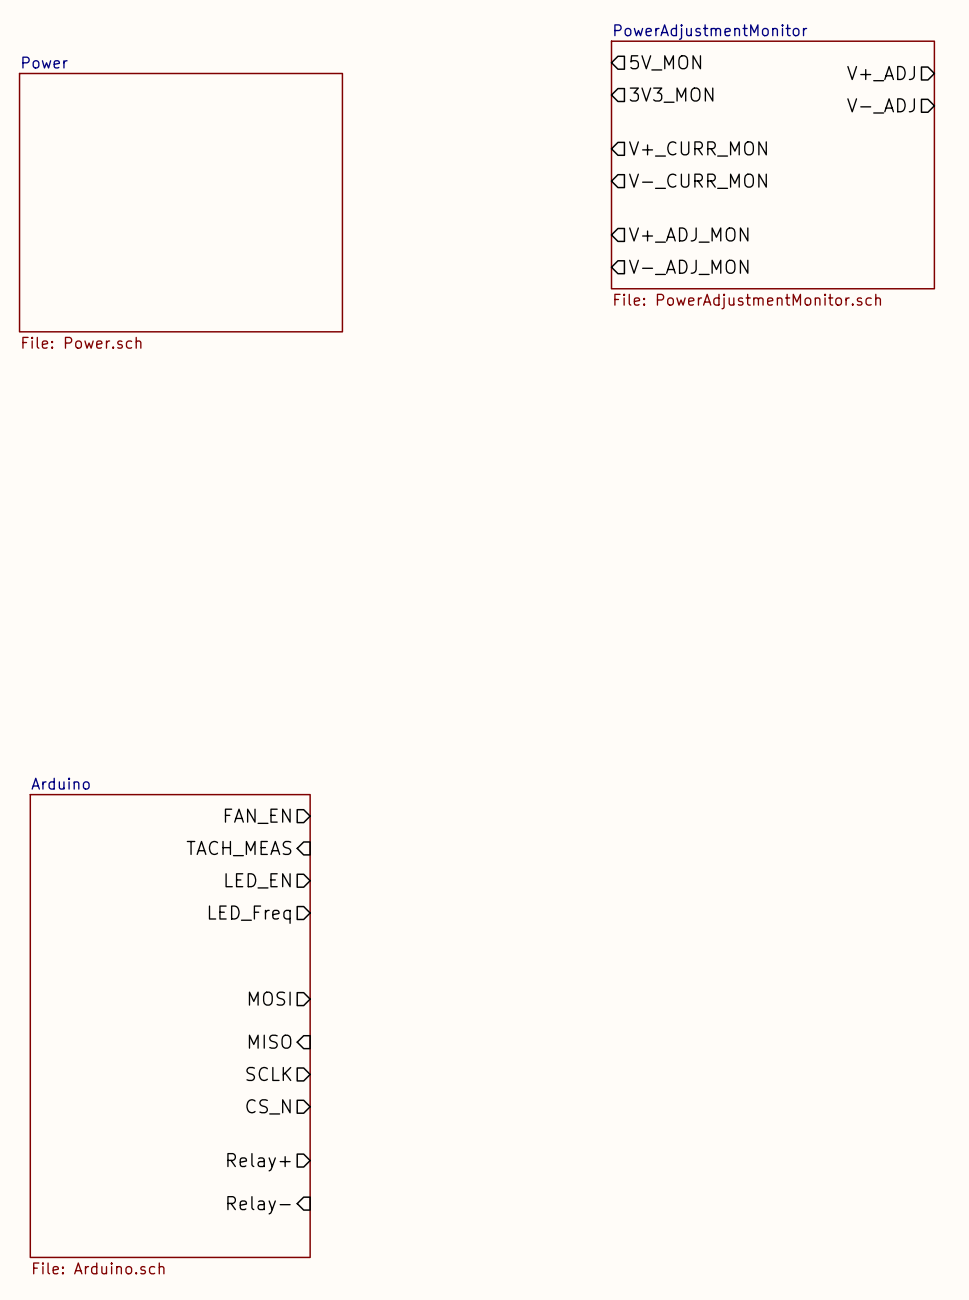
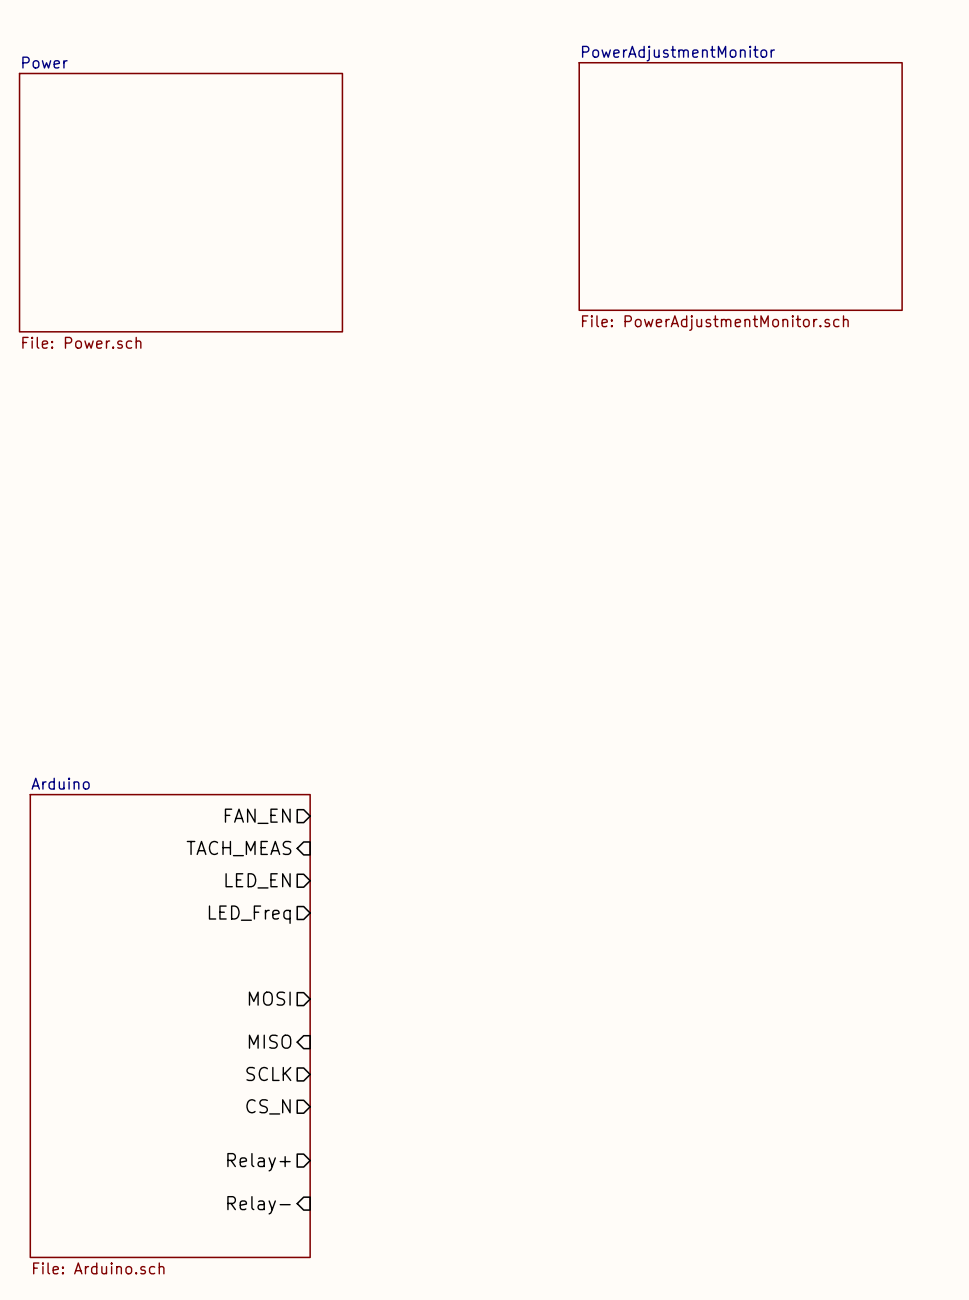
sheet pin: 5V_MON (665, 62) -> none
sheet pin: V+_ADJ (881, 73) -> none
sheet pin: 3V3_MON (671, 95) -> none
sheet pin: V-_ADJ (881, 105) -> none
sheet pin: V+_CURR_MON (697, 148) -> none
sheet PowerAdjustmentMonitor position: (772, 164) -> (740, 186)
sheet pin: V-_CURR_MON (697, 181) -> none
sheet pin: V+_ADJ_MON (688, 235) -> none
sheet pin: V-_ADJ_MON (688, 267) -> none

